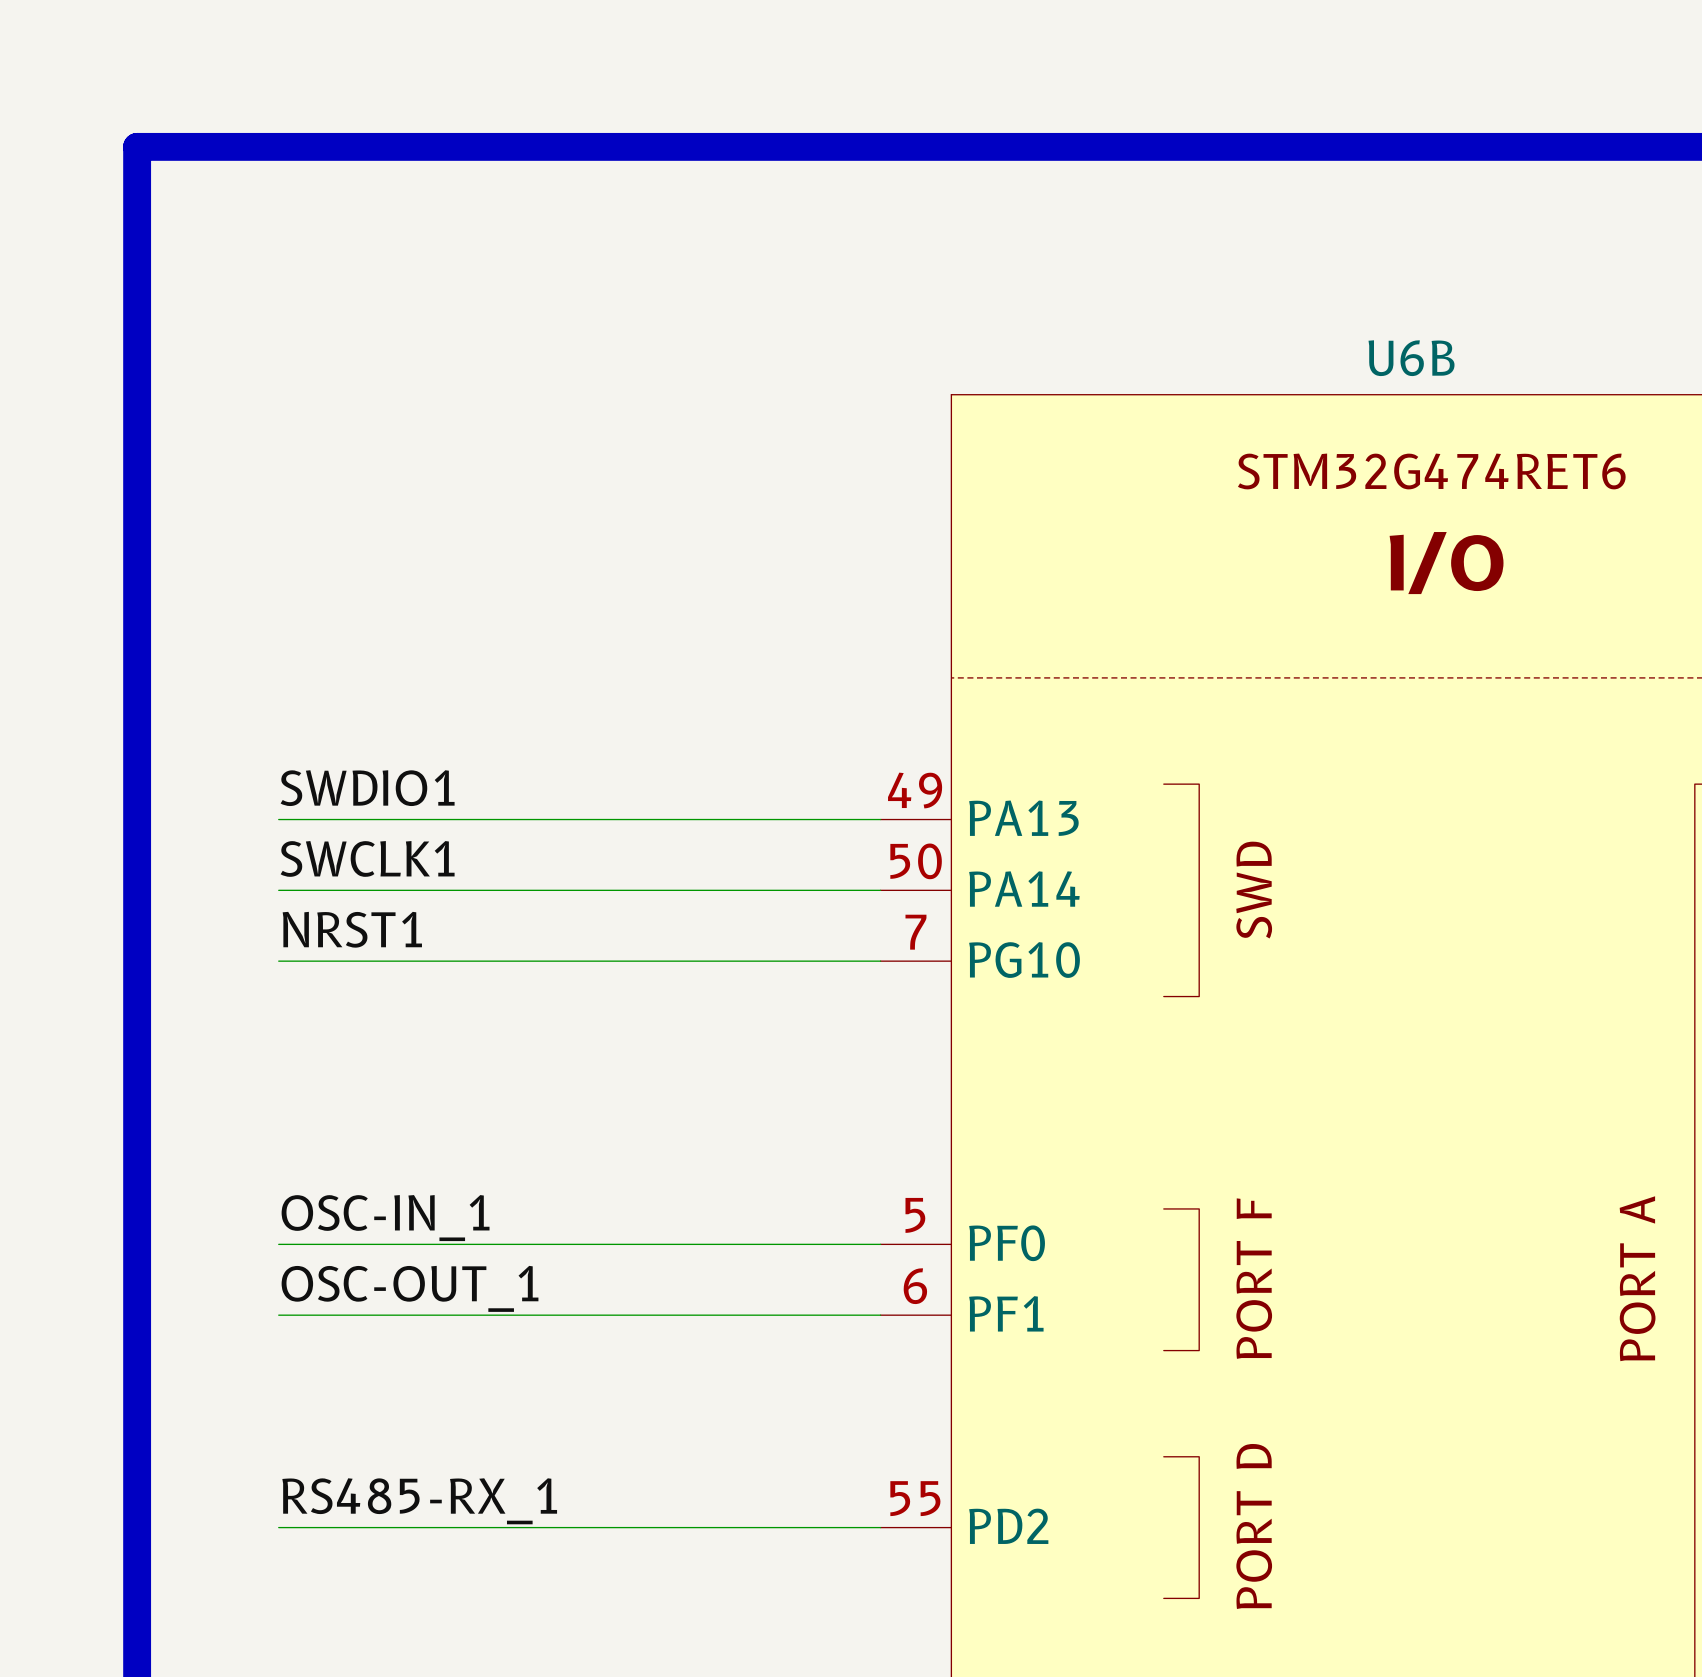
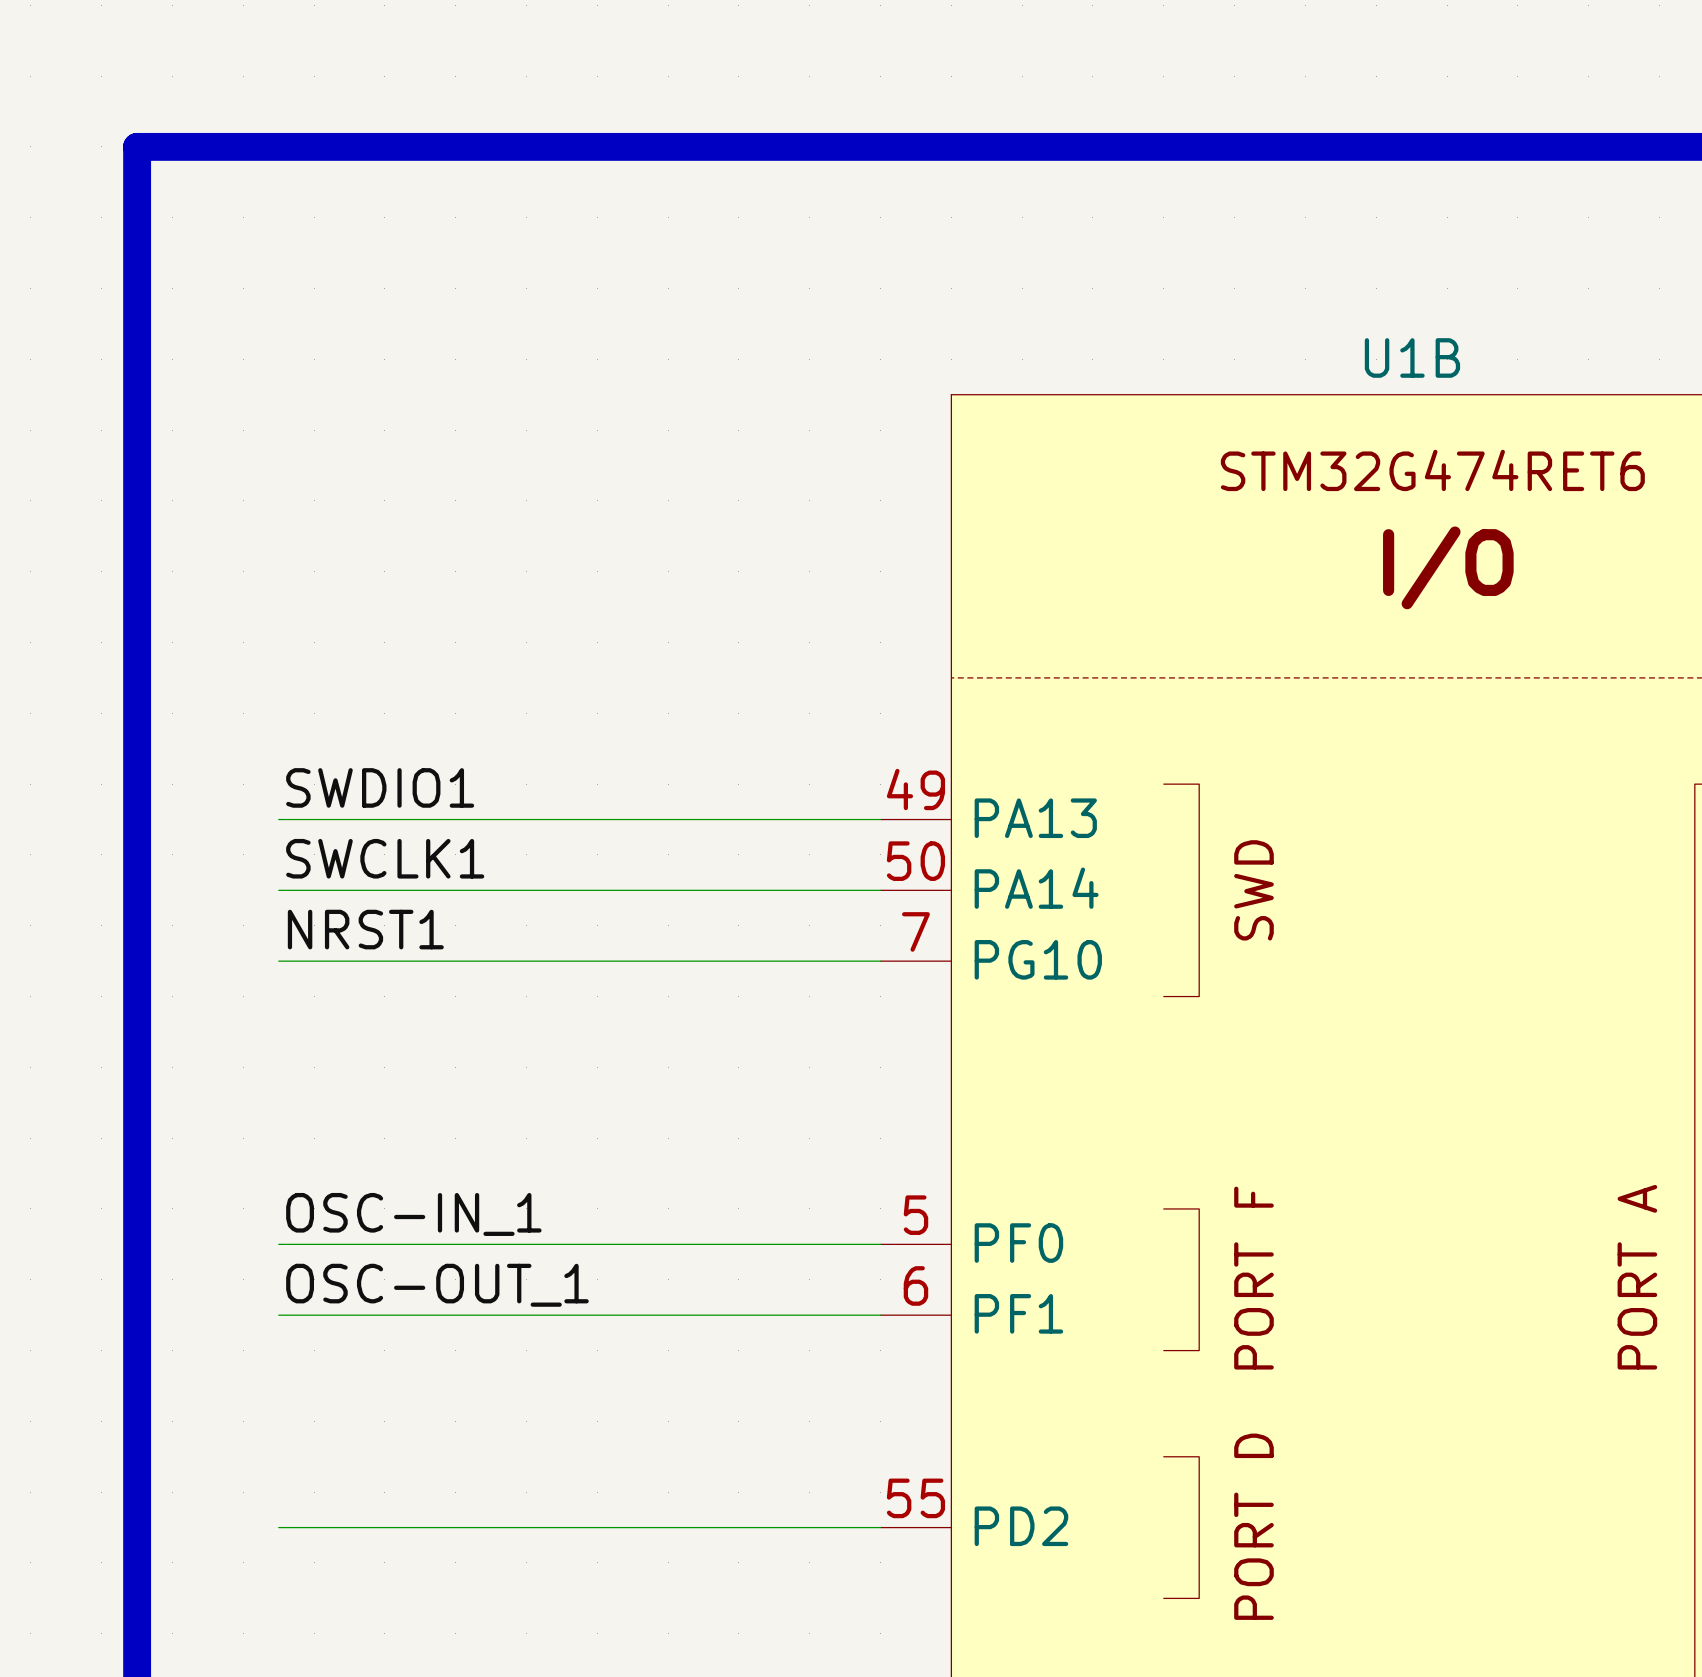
U6B name: U6B (1411, 358) -> U1B (1412, 357)
label: RS485-RX_1 (419, 1501) -> none

